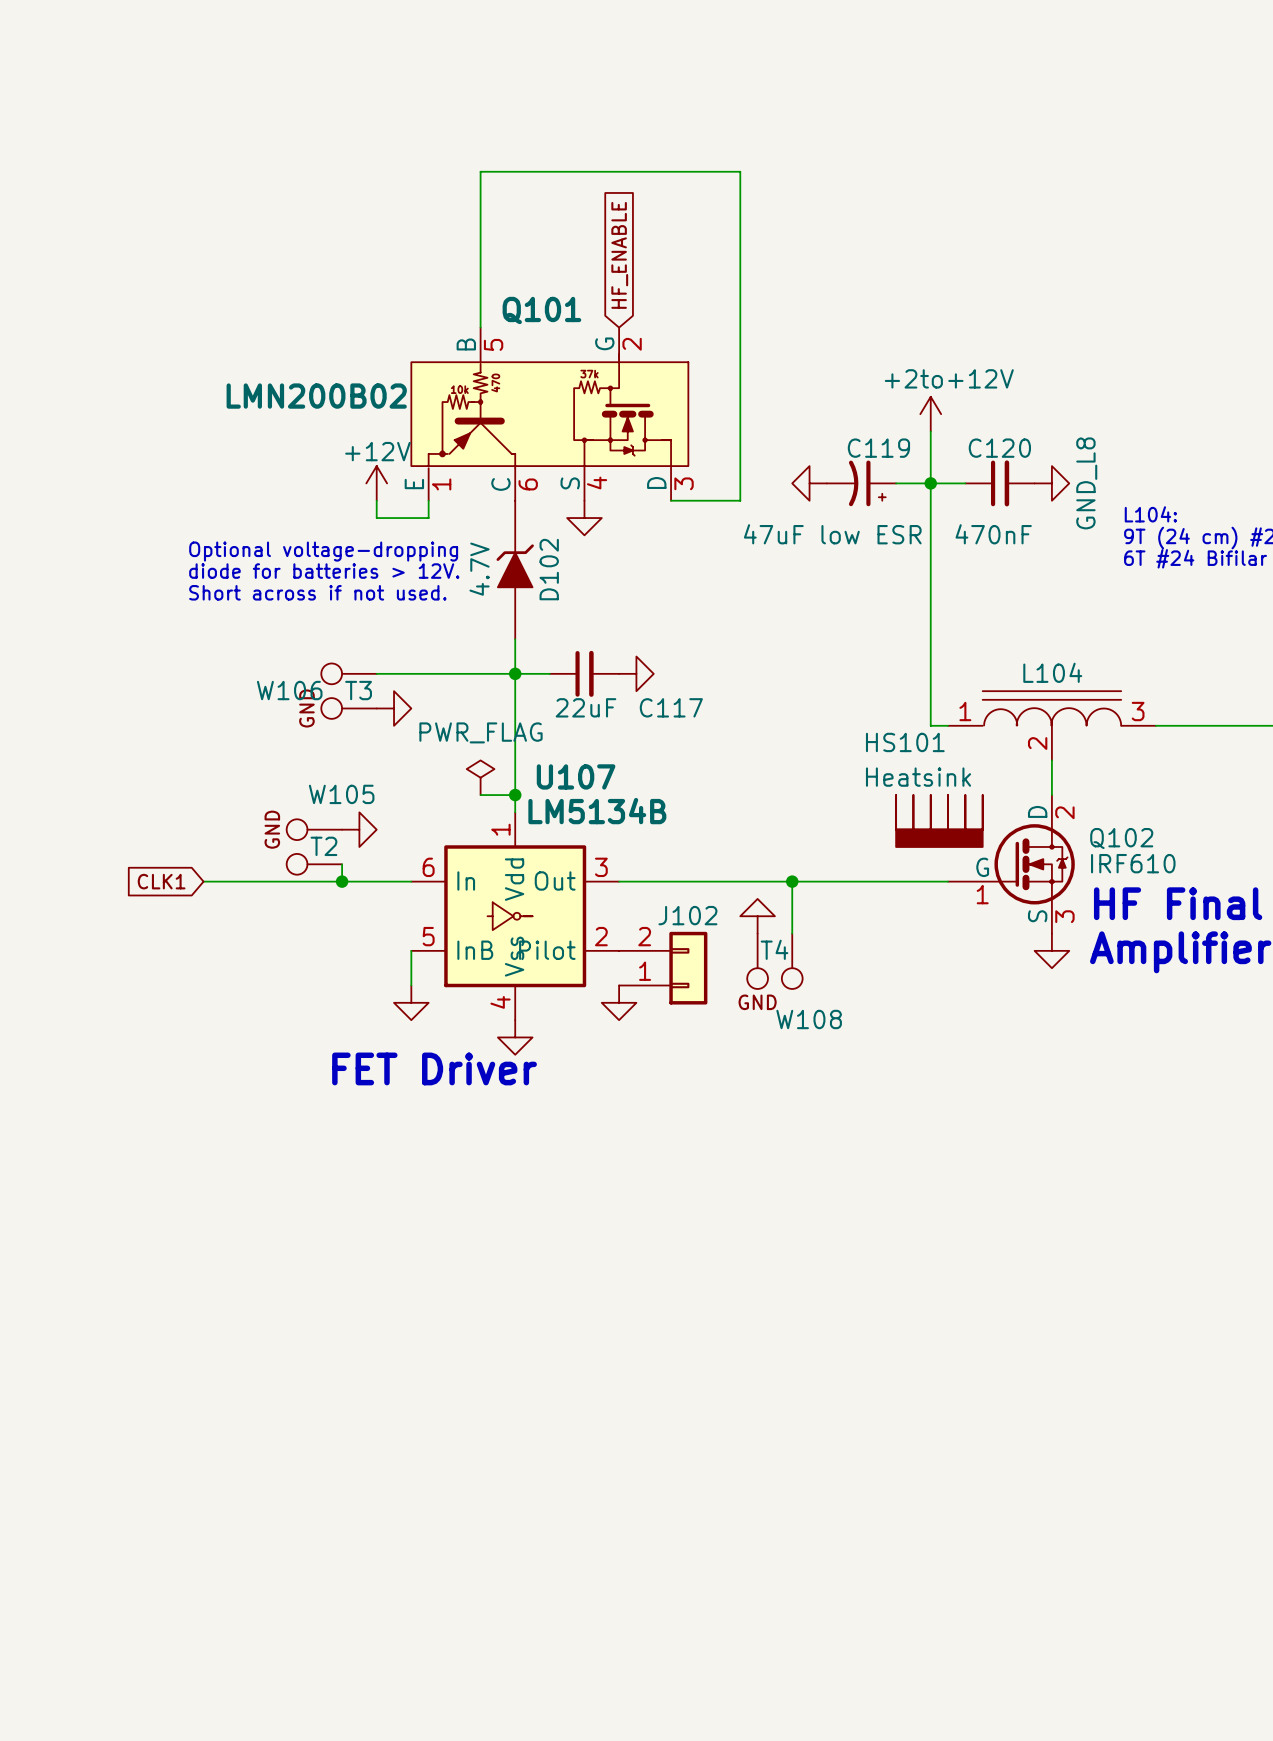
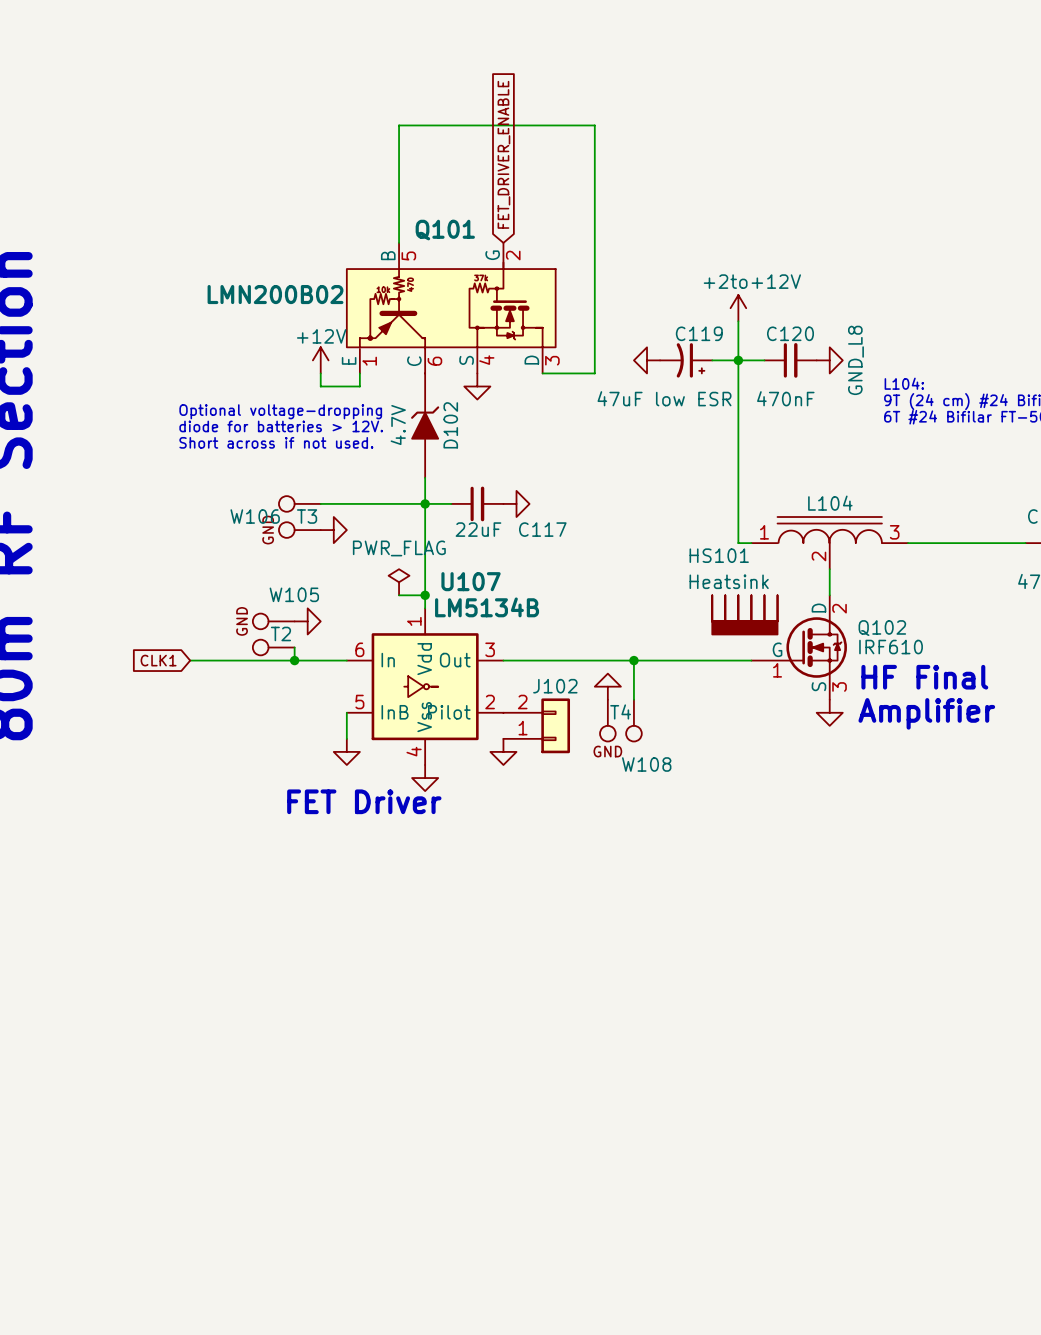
global label: HF_ENABLE (619, 255) -> FET_DRIVER_ENABLE (503, 154)

